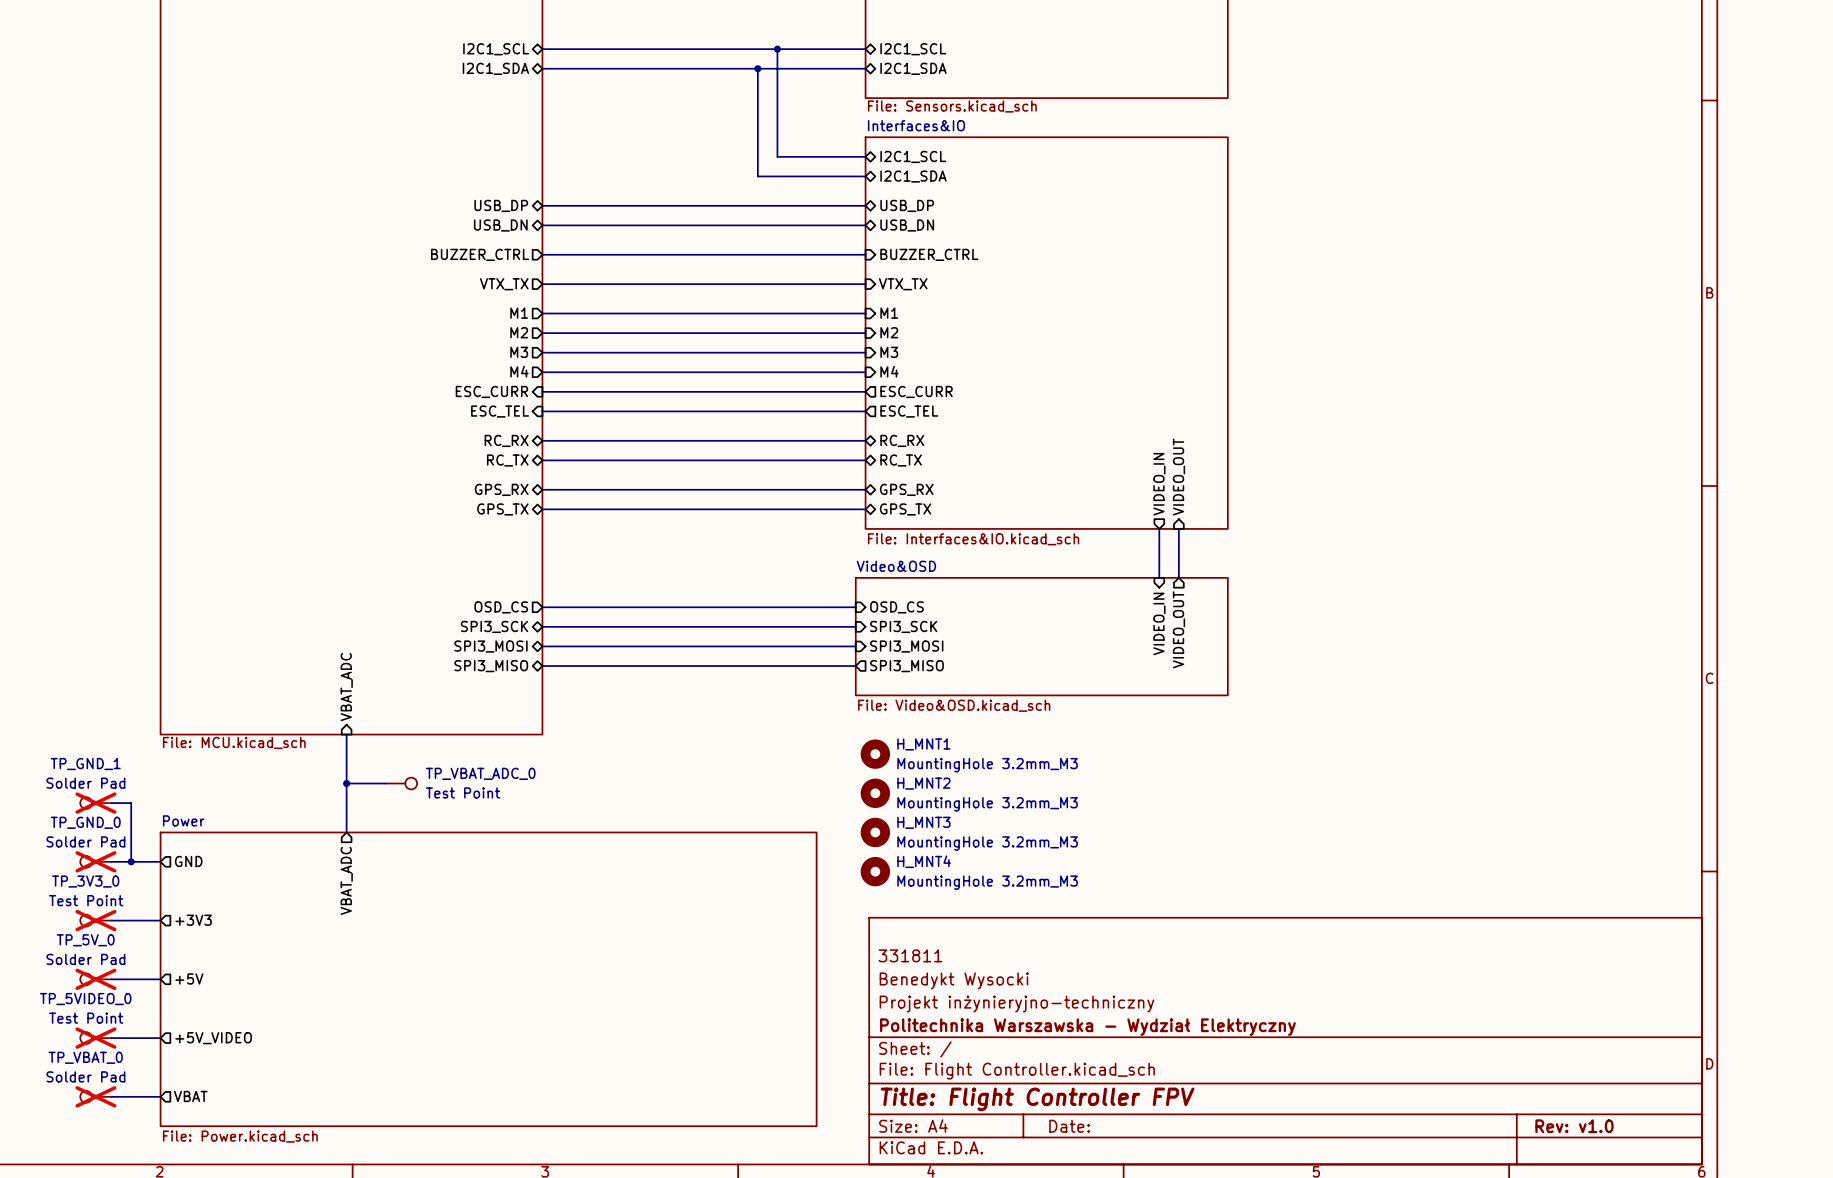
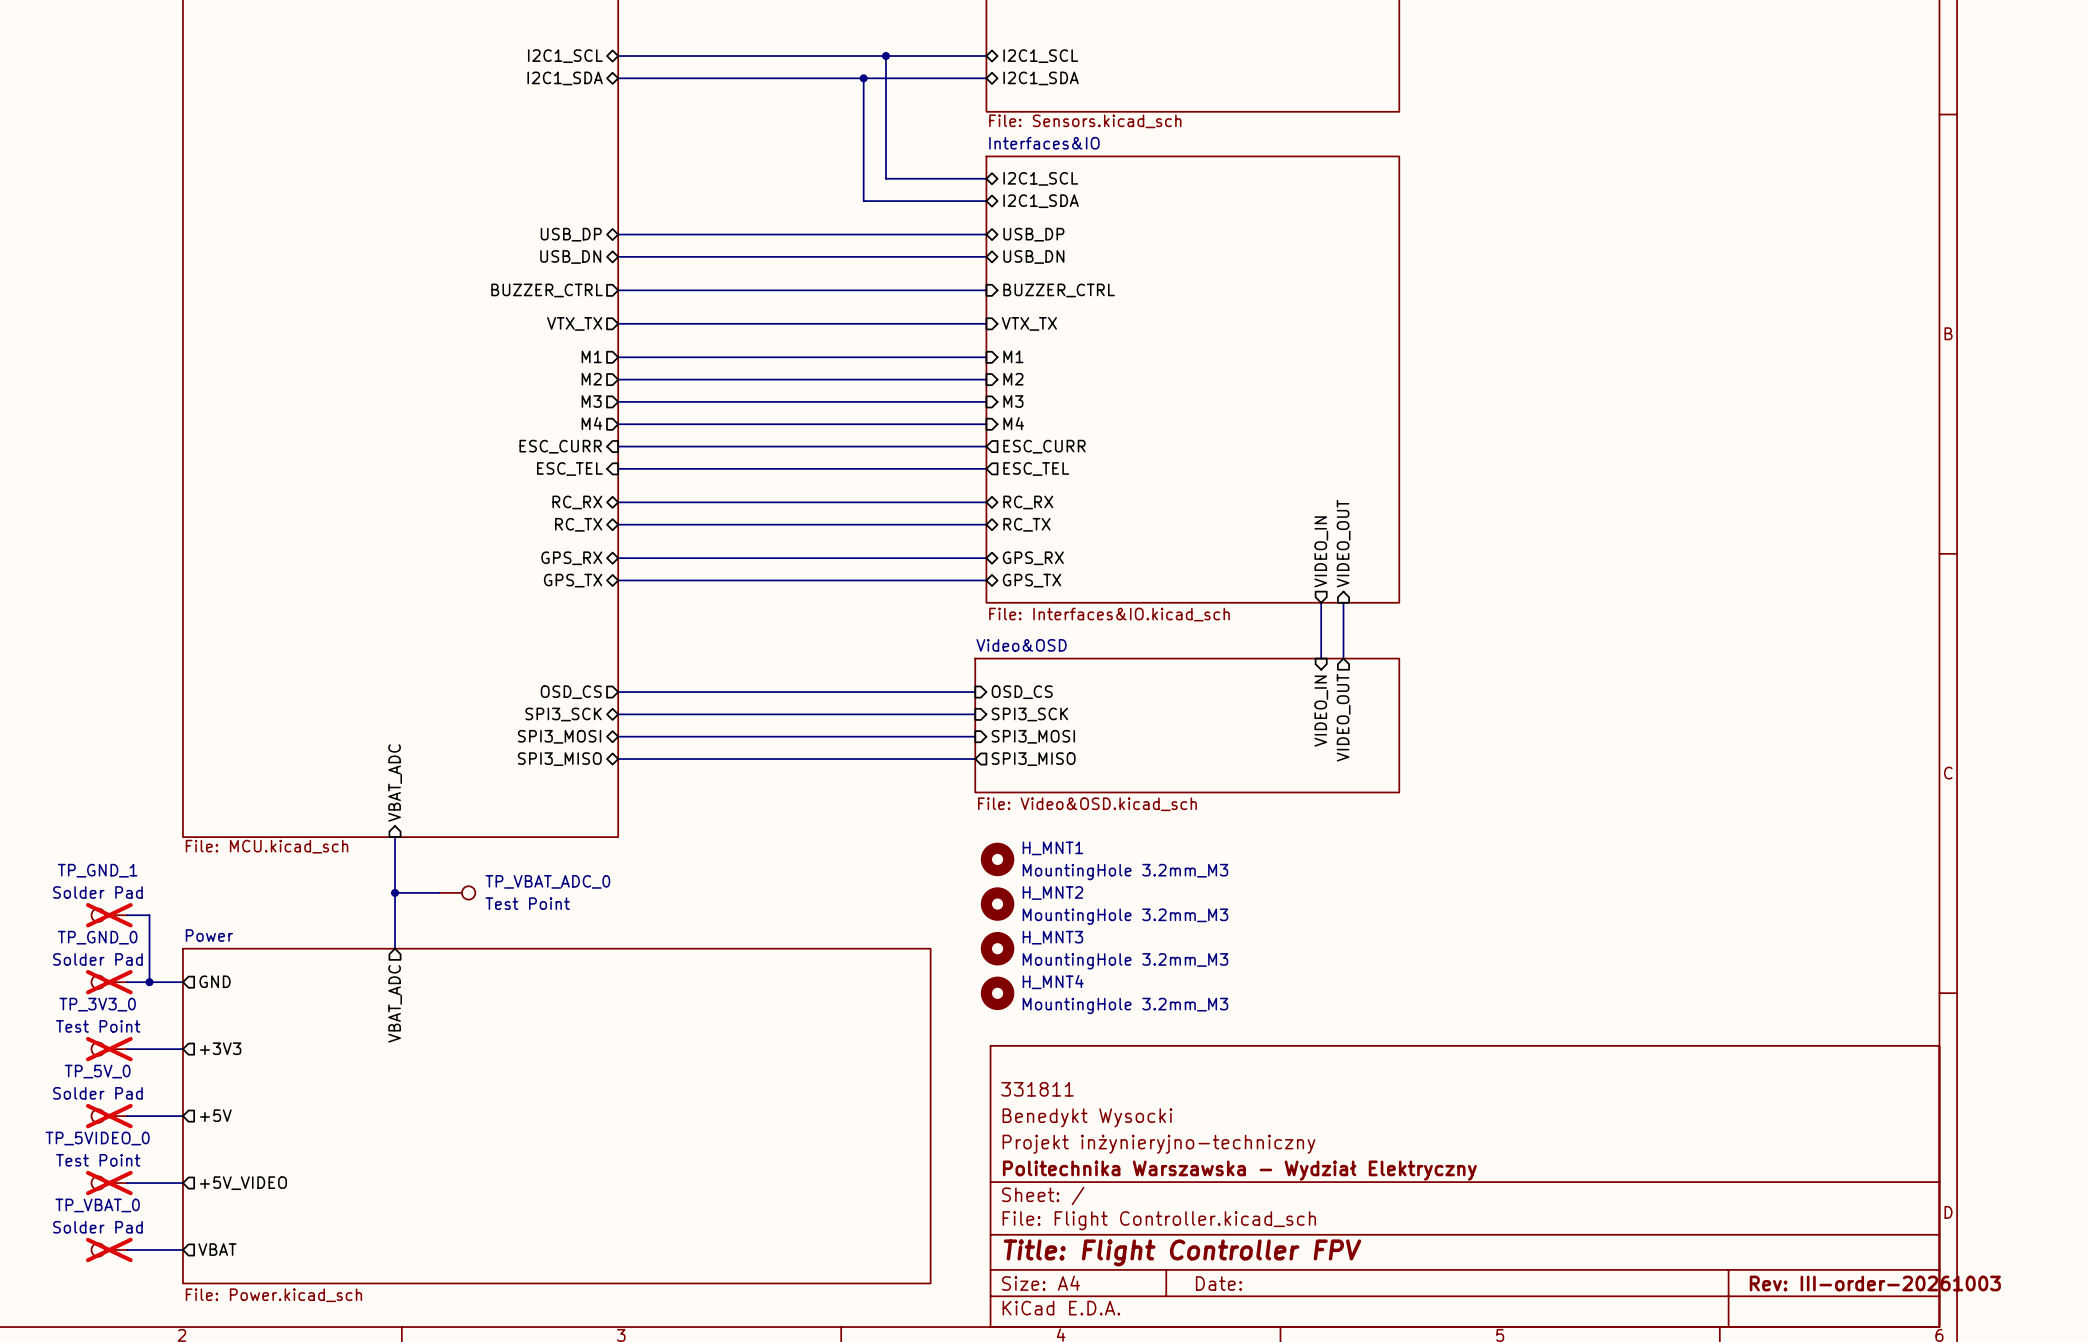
title block: Rev: v1.0 (1574, 1126) -> Rev: III-order-20261003 (1875, 1283)

